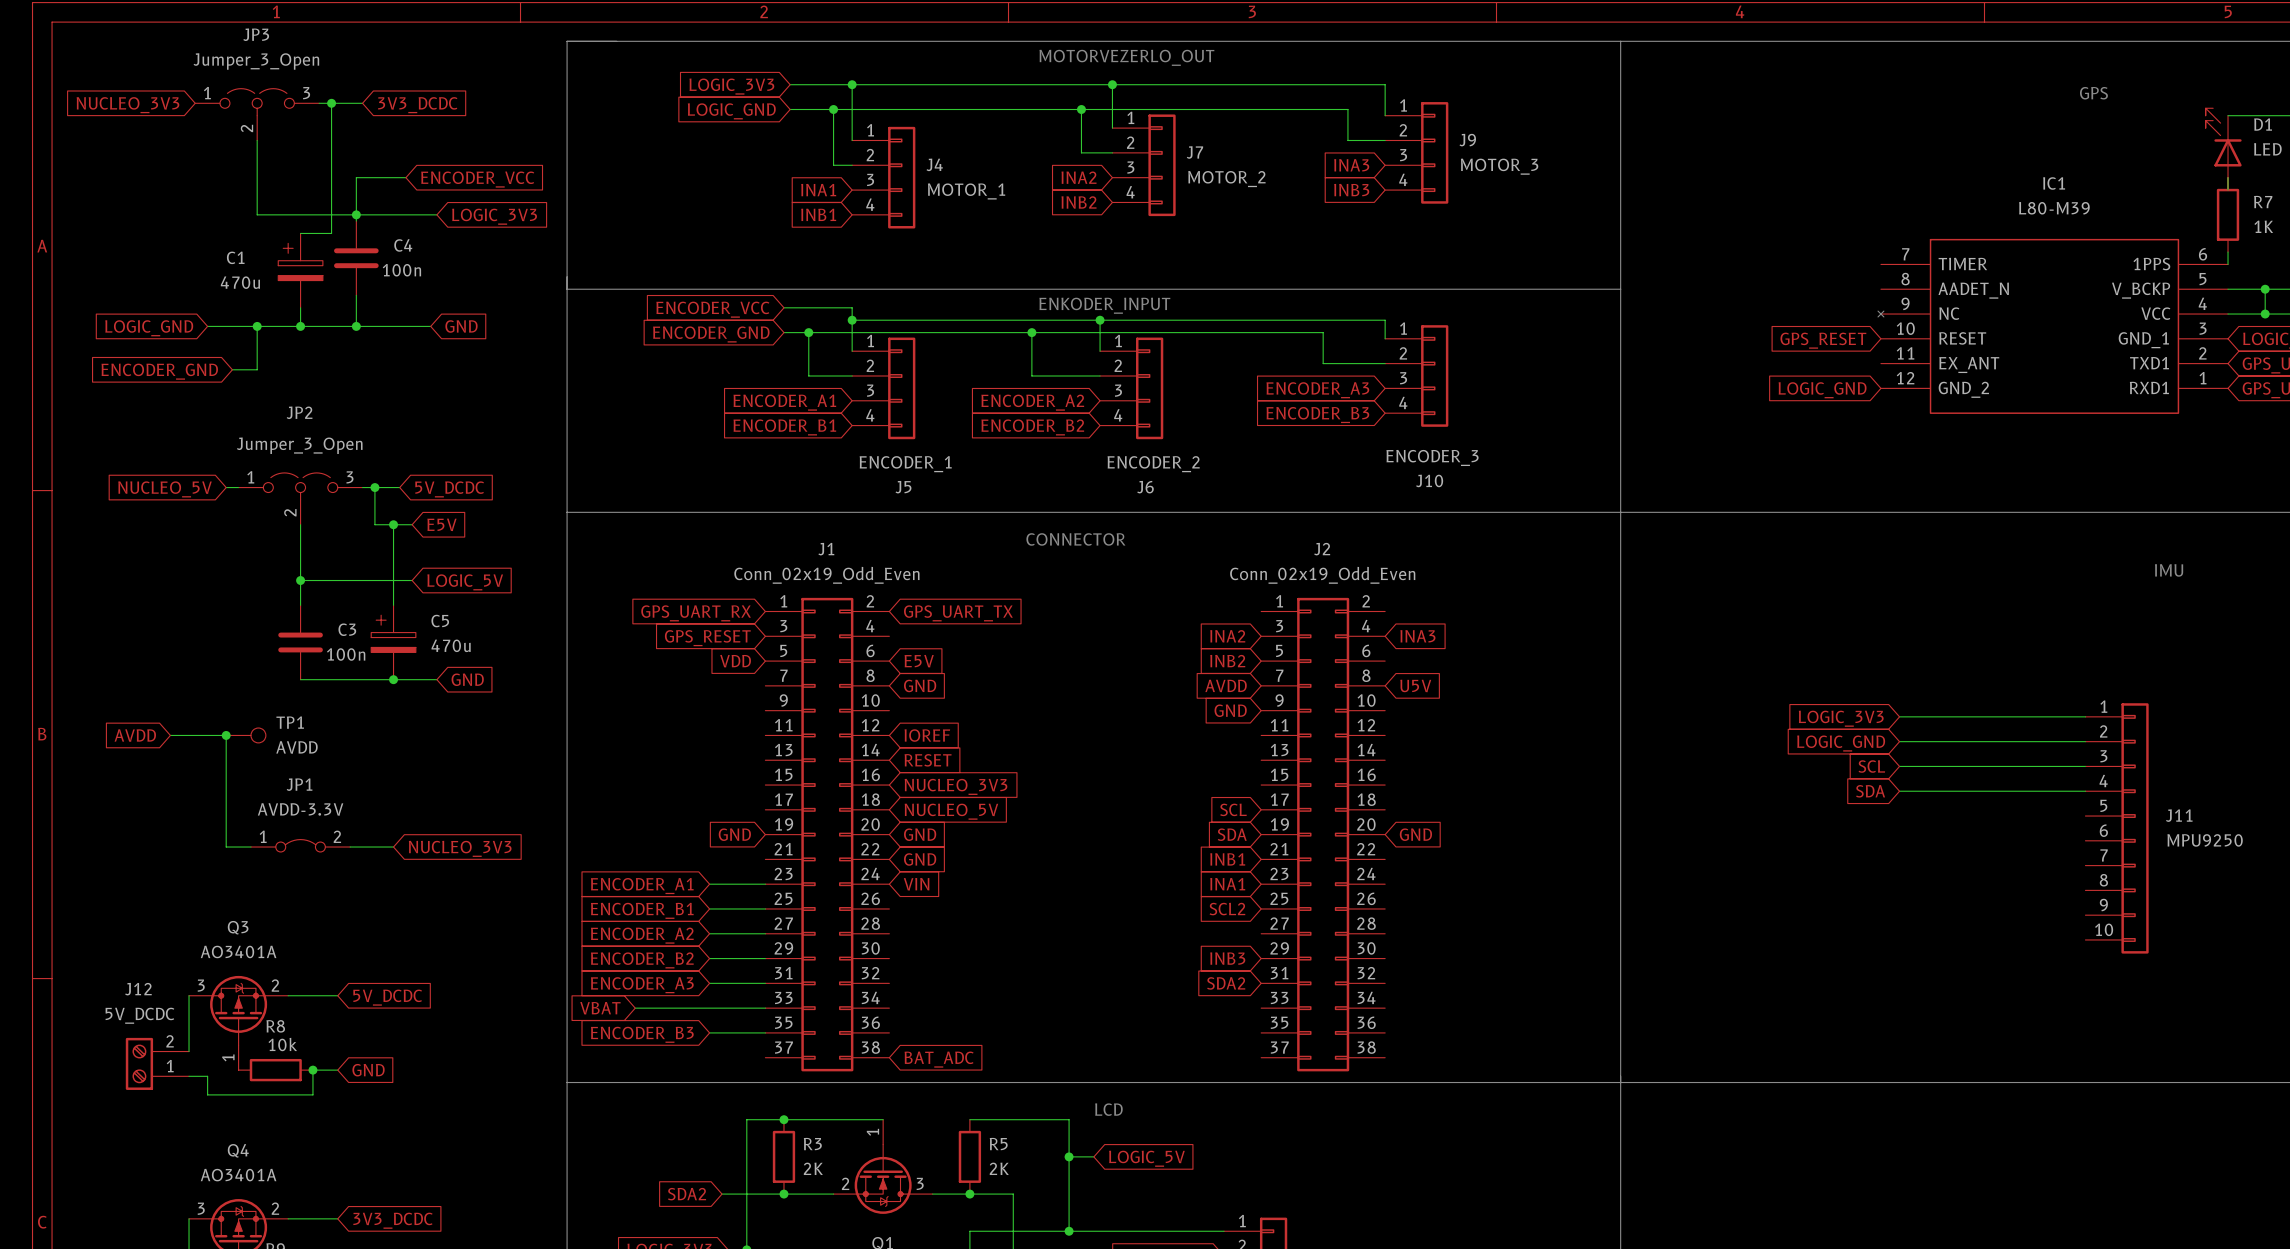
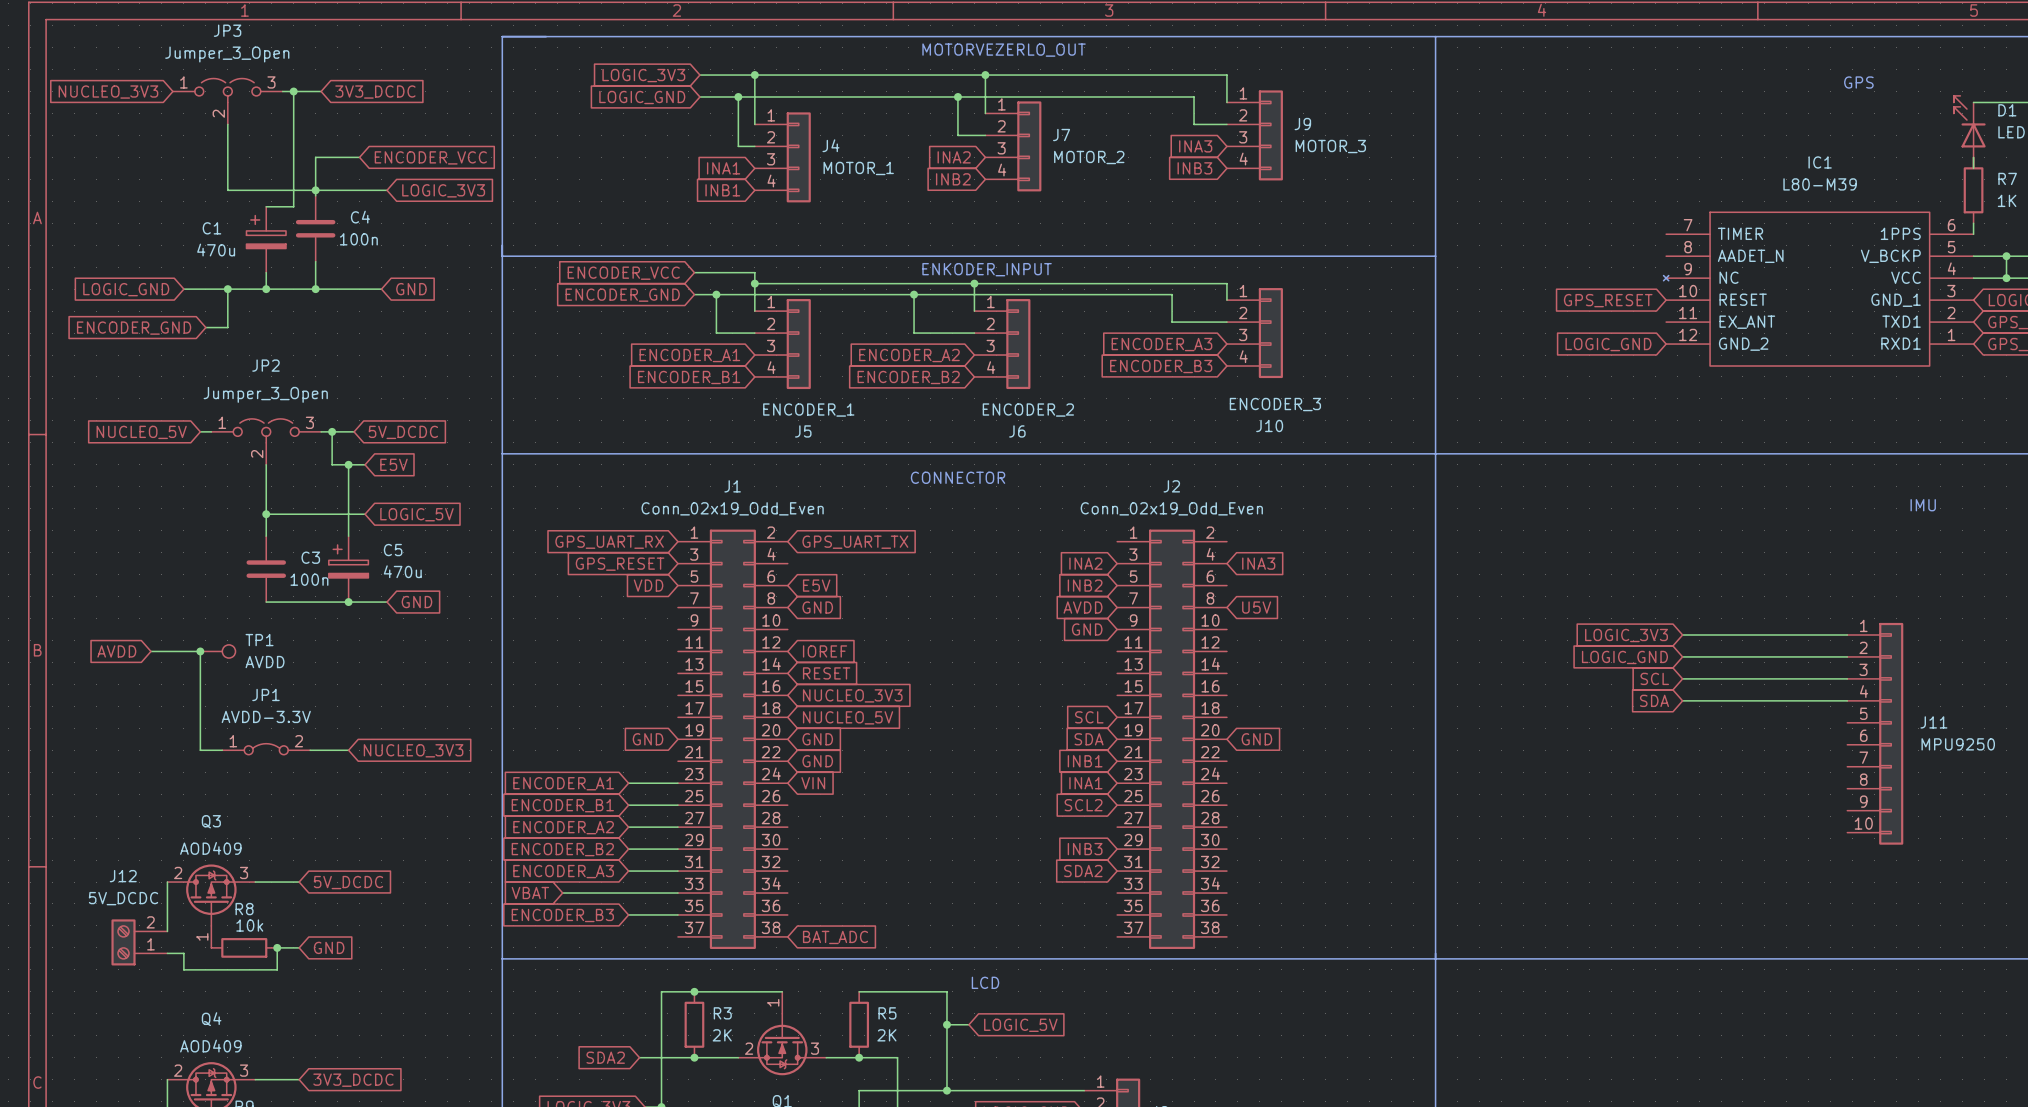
Q3 value: AO3401A (238, 951) -> AOD409 (210, 848)
Q3 pin number: 3 (201, 985) -> 2 (178, 872)
Q3 pin number: 2 (275, 985) -> 3 (244, 872)
Q4 value: AO3401A (238, 1175) -> AOD409 (210, 1046)
Q4 pin number: 3 (201, 1208) -> 2 (178, 1070)
Q4 pin number: 2 (275, 1208) -> 3 (244, 1070)

